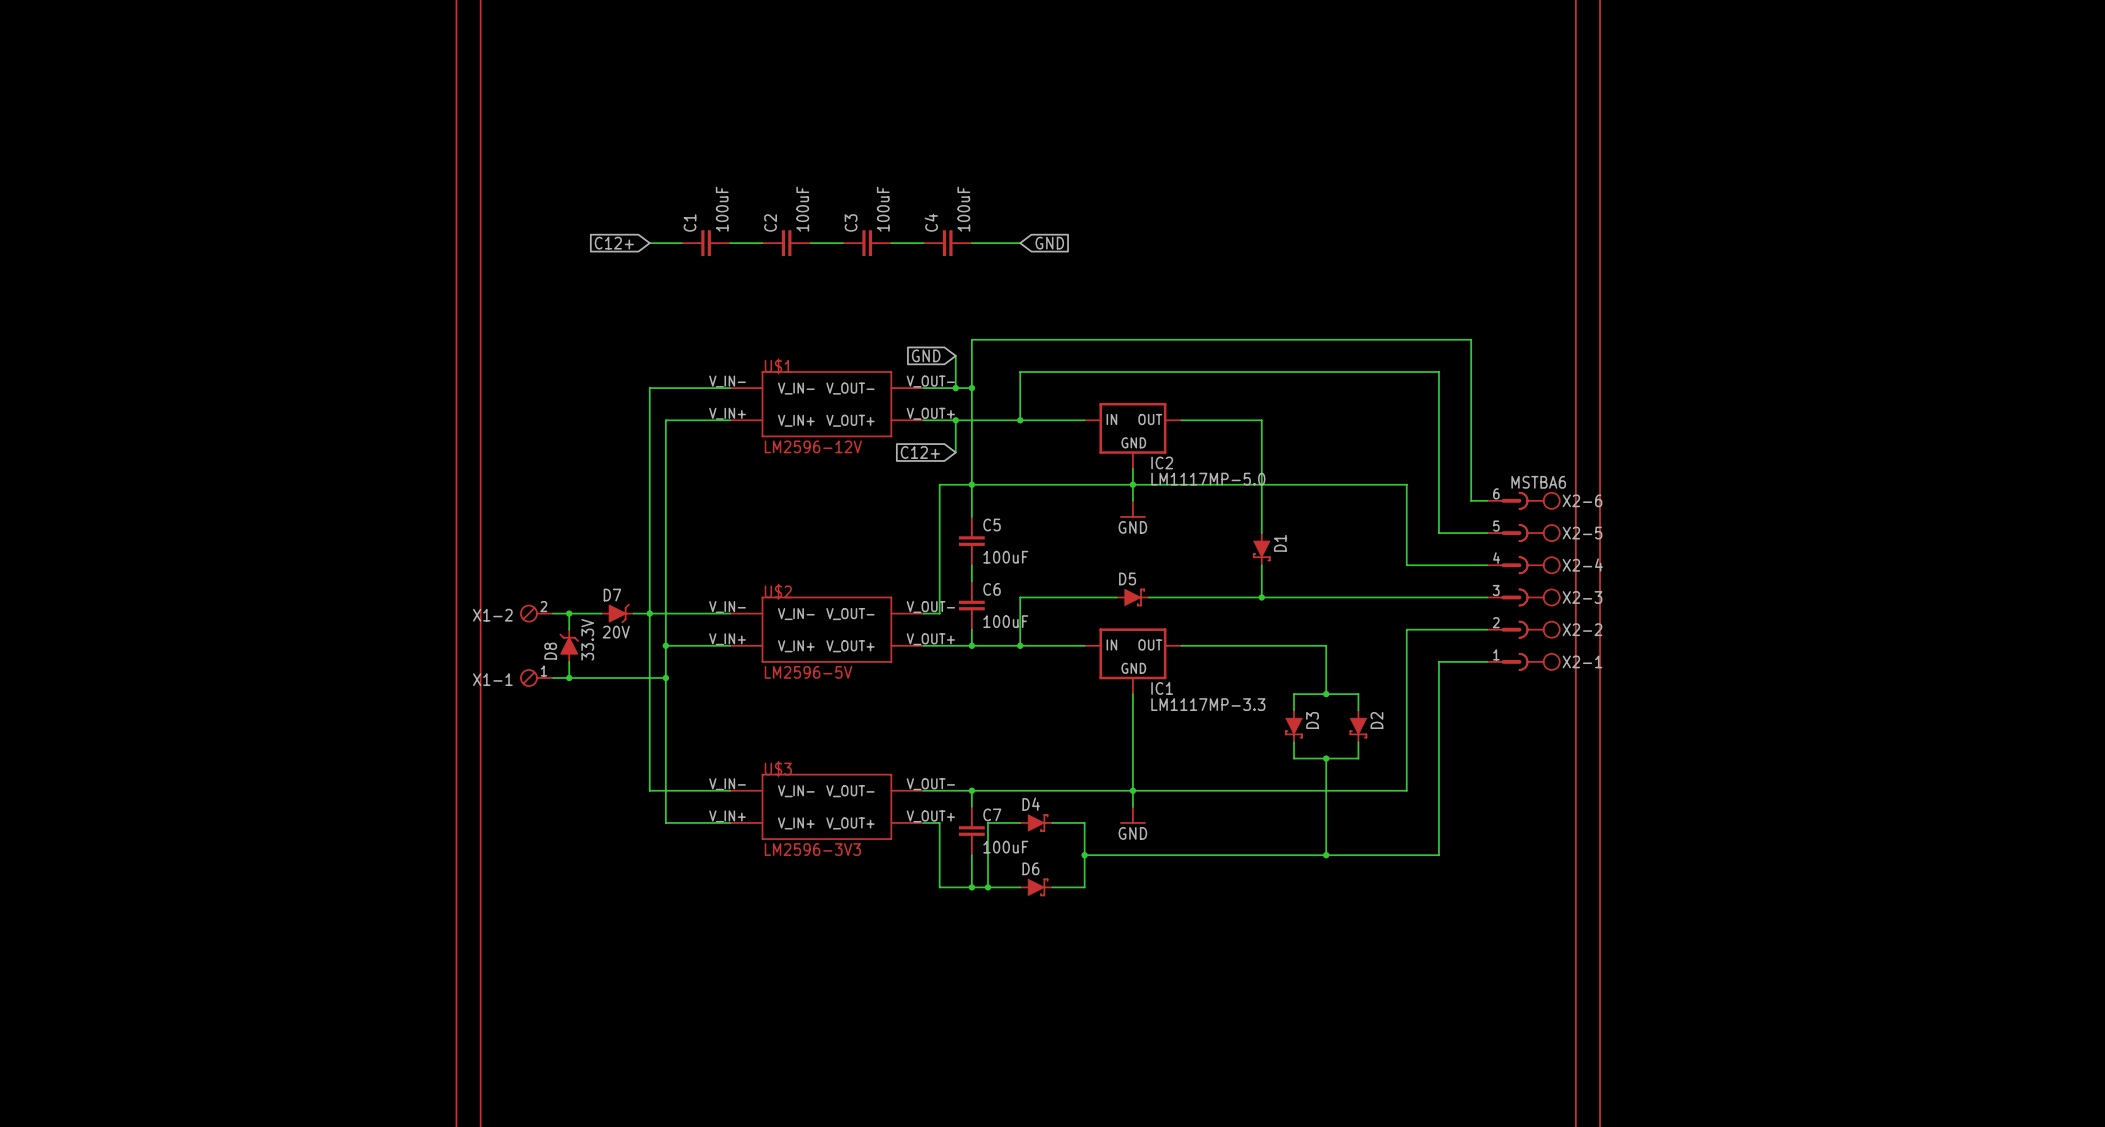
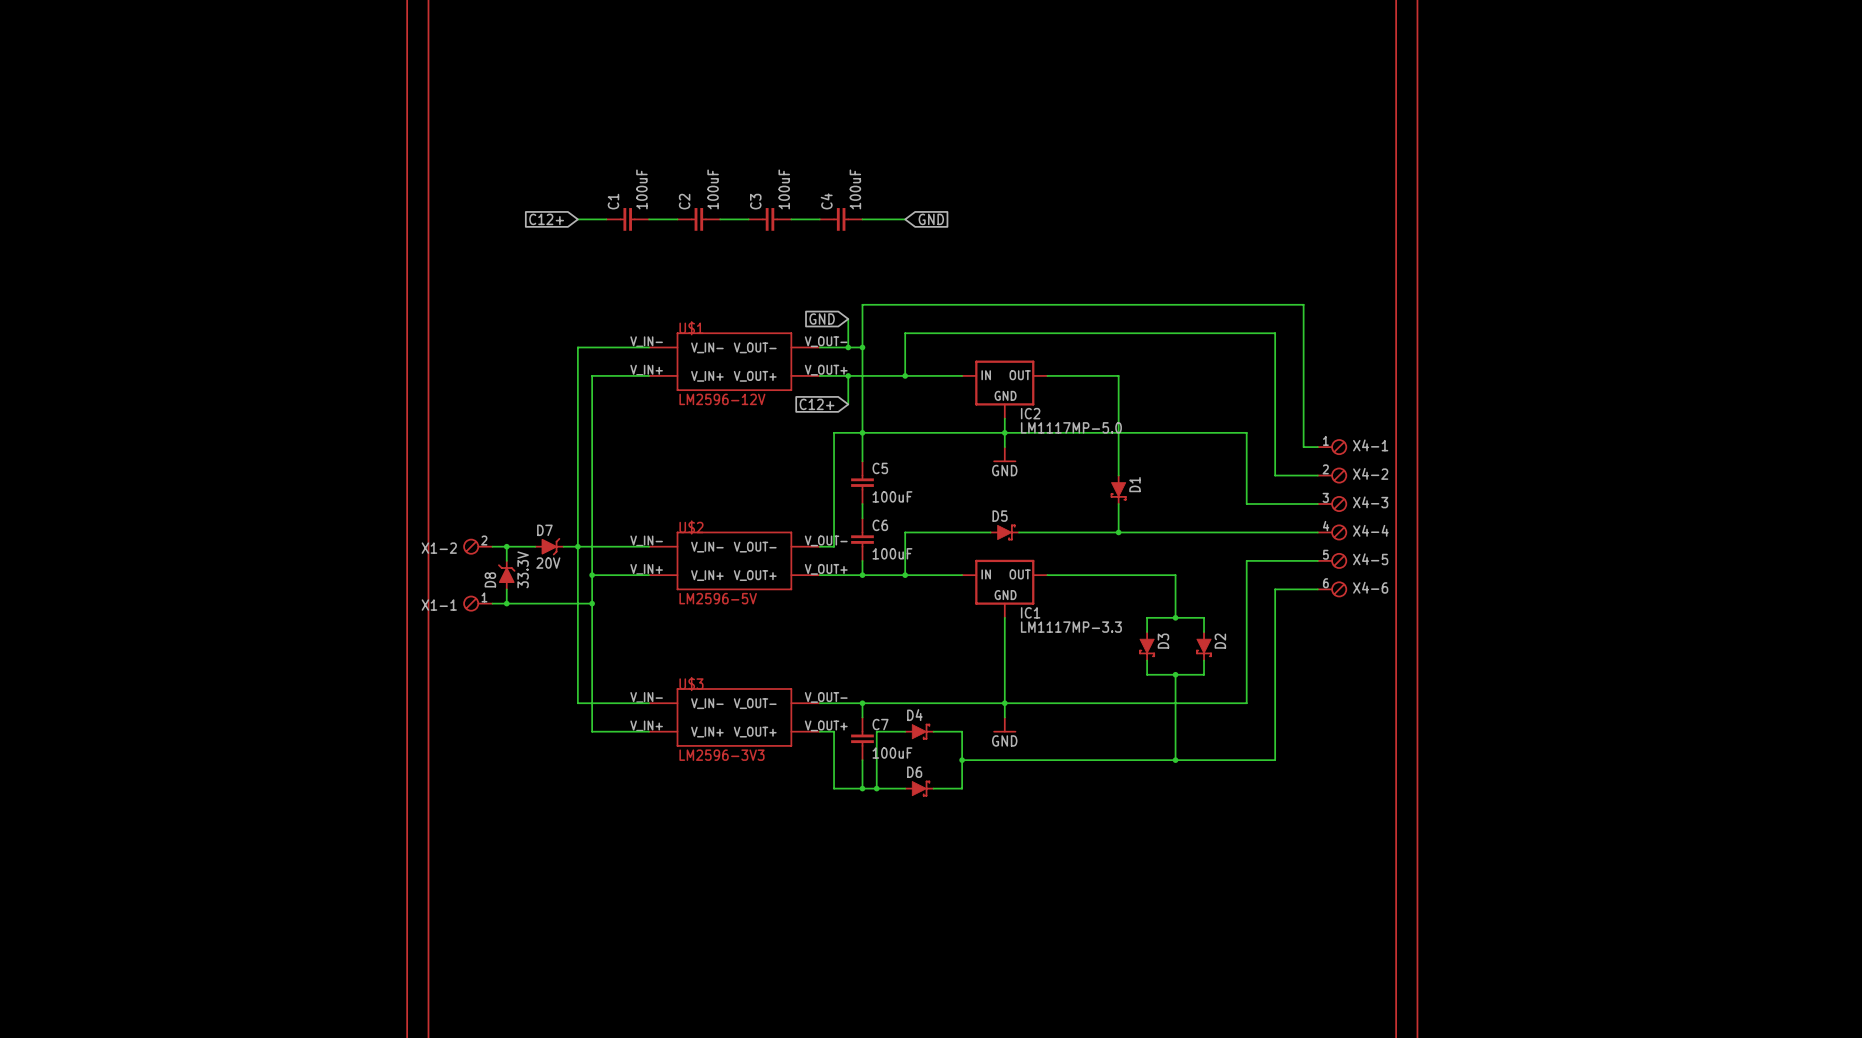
X4-1: none -> (1332, 447)
X2-6: MSTBA6 (1523, 500) -> none
X4-2: none -> (1332, 475)
X2-5: (1523, 533) -> none
X4-3: none -> (1332, 504)
X2-4: (1523, 565) -> none
X4-4: none -> (1332, 532)
X2-3: (1523, 597) -> none
X4-5: none -> (1332, 560)
X2-2: (1523, 629) -> none
X4-6: none -> (1332, 589)
X2-1: (1523, 661) -> none

